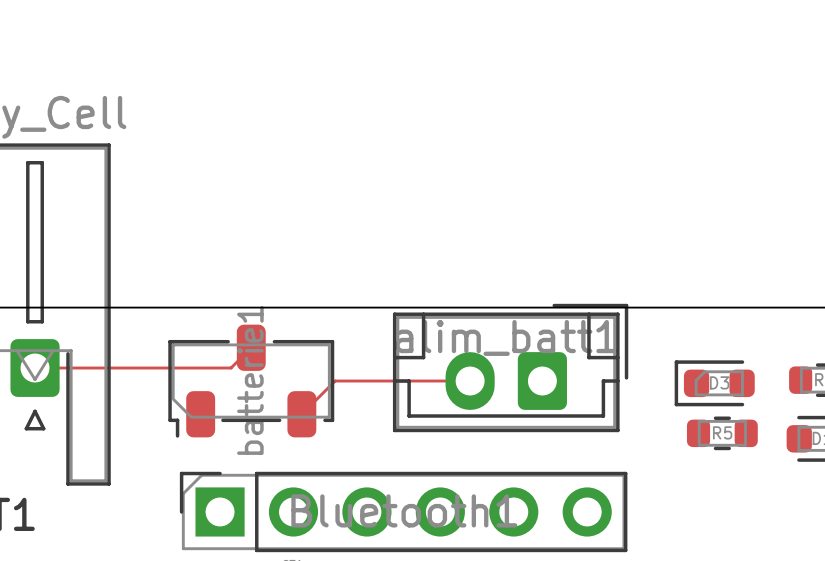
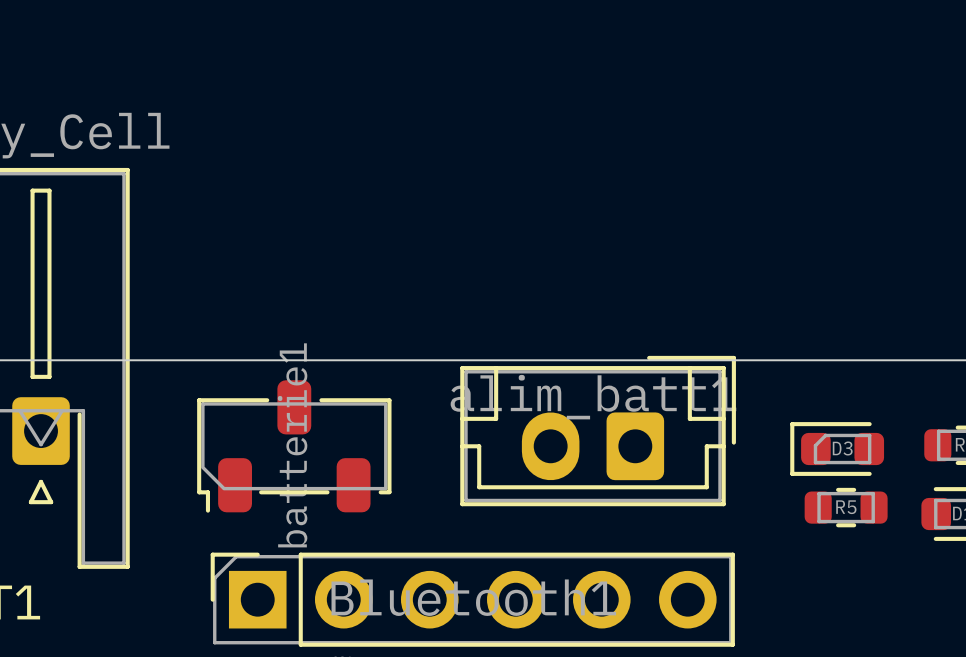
top track: (251, 347) (231, 368) (35, 368) -> none
top track: (470, 381) (335, 381) (301, 414) -> none

